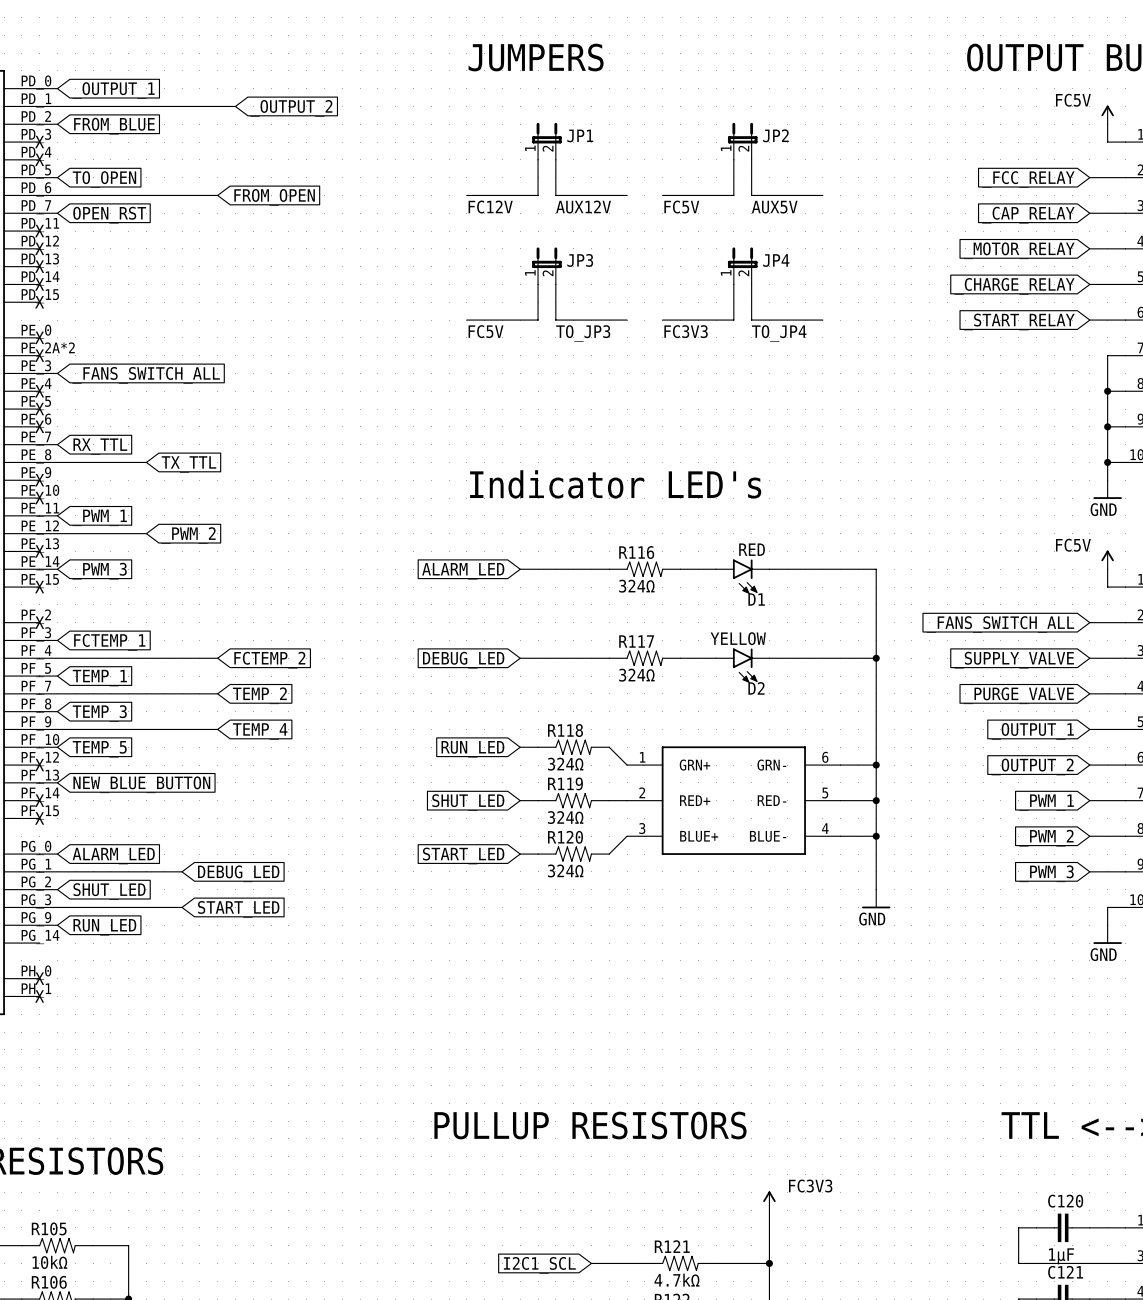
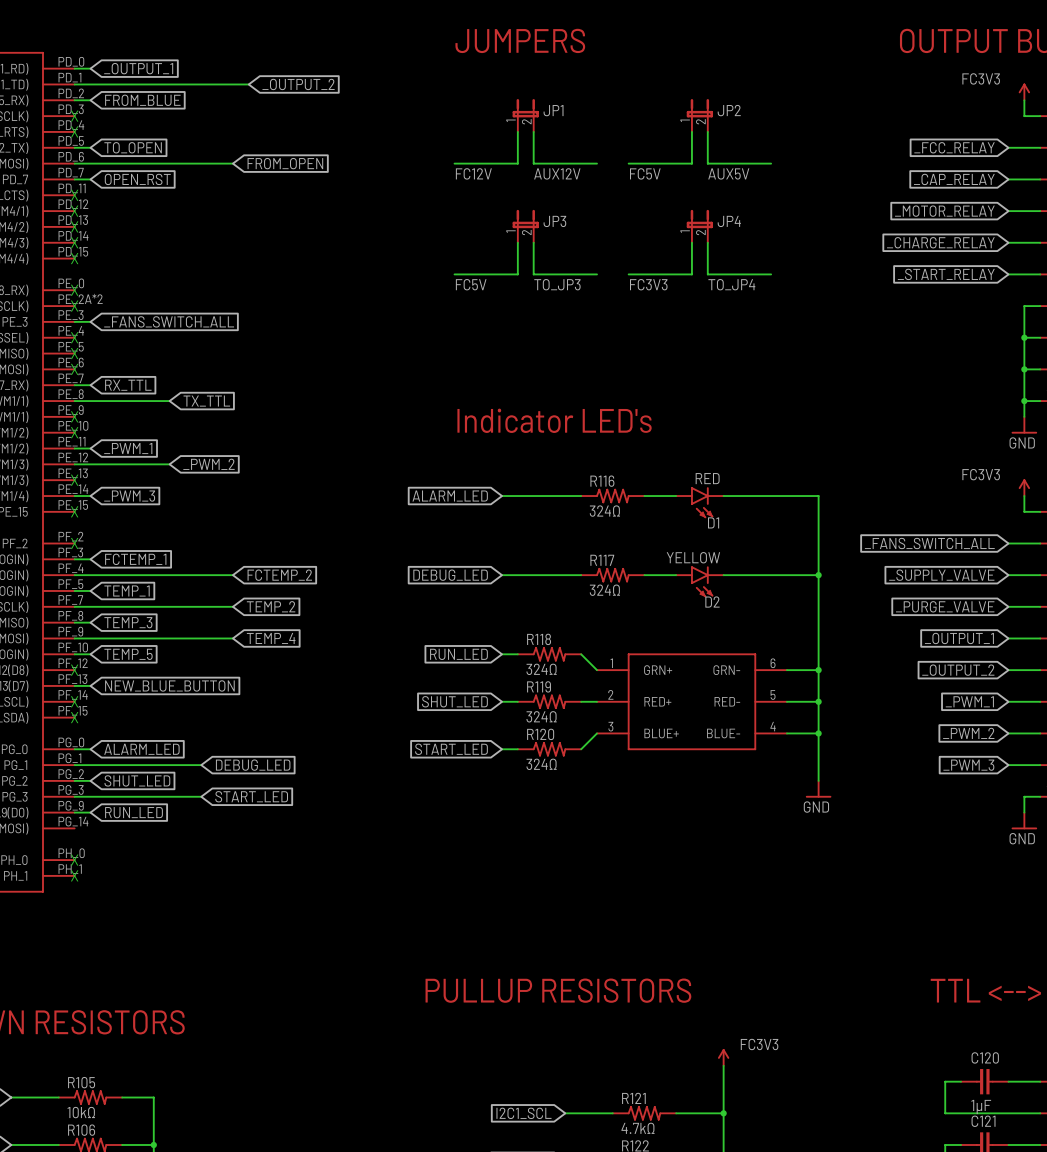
label: FC5V (1073, 100) -> FC3V3 (981, 78)
label: FC5V (1073, 545) -> FC3V3 (981, 474)

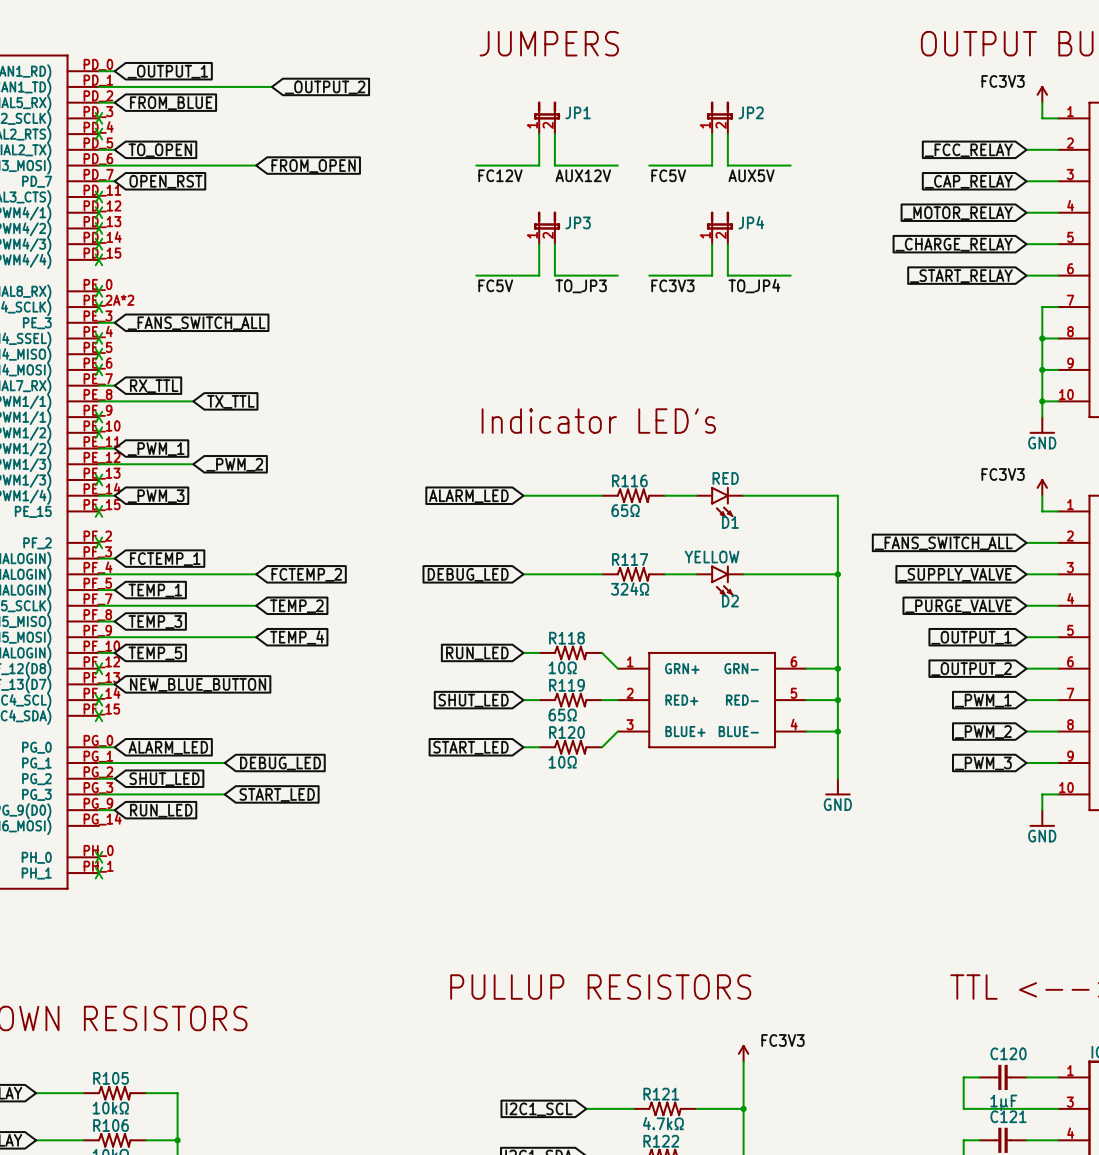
R116 value: 324Ω (604, 511) -> 65Ω (625, 510)
R118 value: 324Ω (541, 669) -> 10Ω (562, 667)
R119 value: 324Ω (541, 716) -> 65Ω (562, 715)
R120 value: 324Ω (541, 764) -> 10Ω (562, 762)

